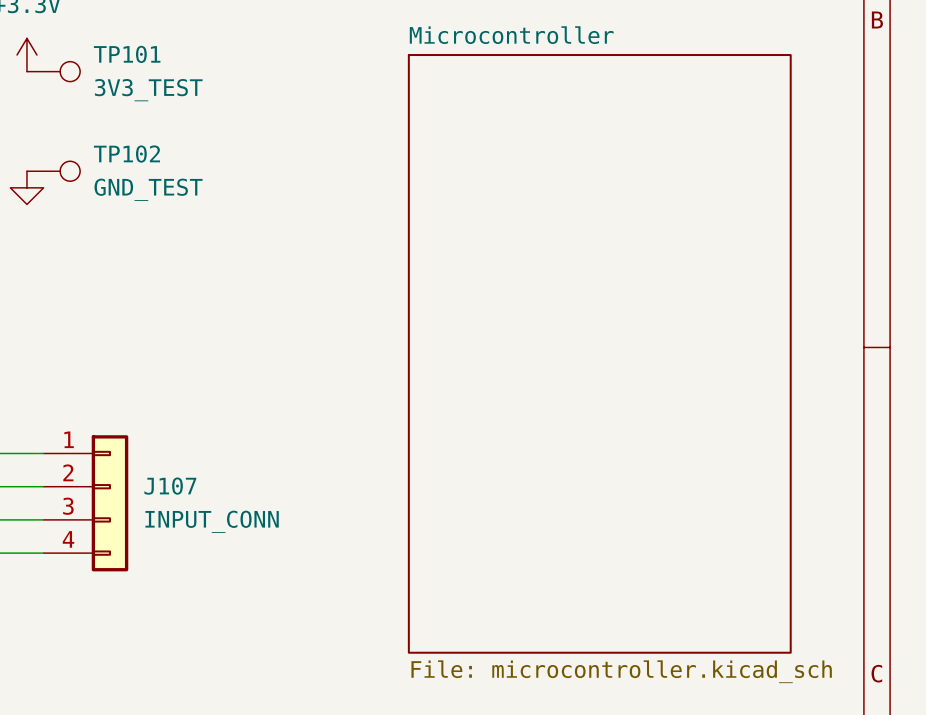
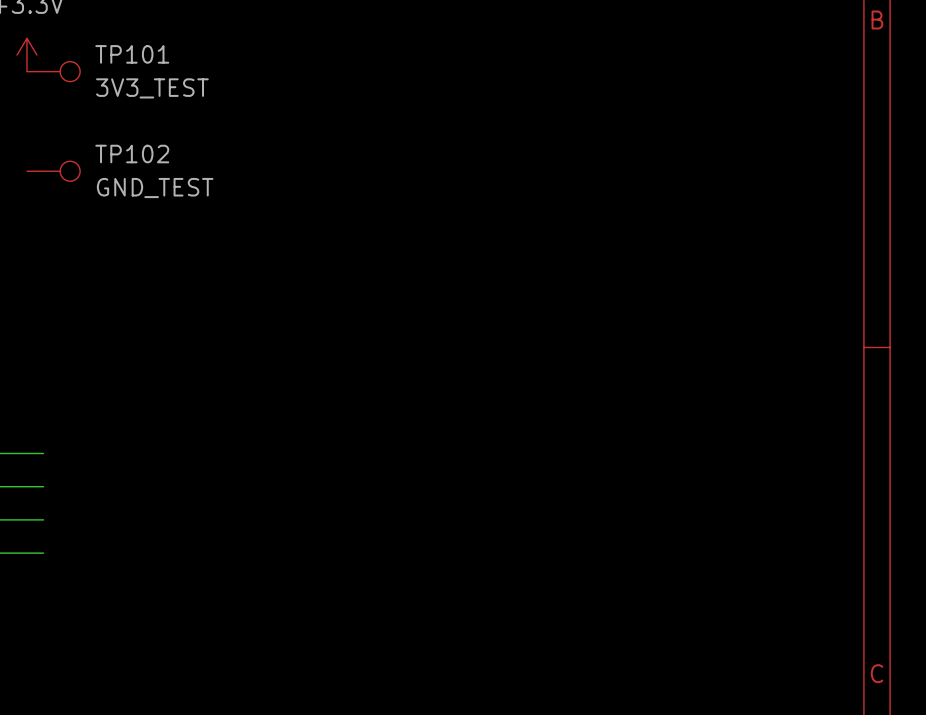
power symbol: (26, 187) -> none
sheet Microcontroller: File: microcontroller.kicad_sch (599, 353) -> none
J107: INPUT_CONN (85, 503) -> none

